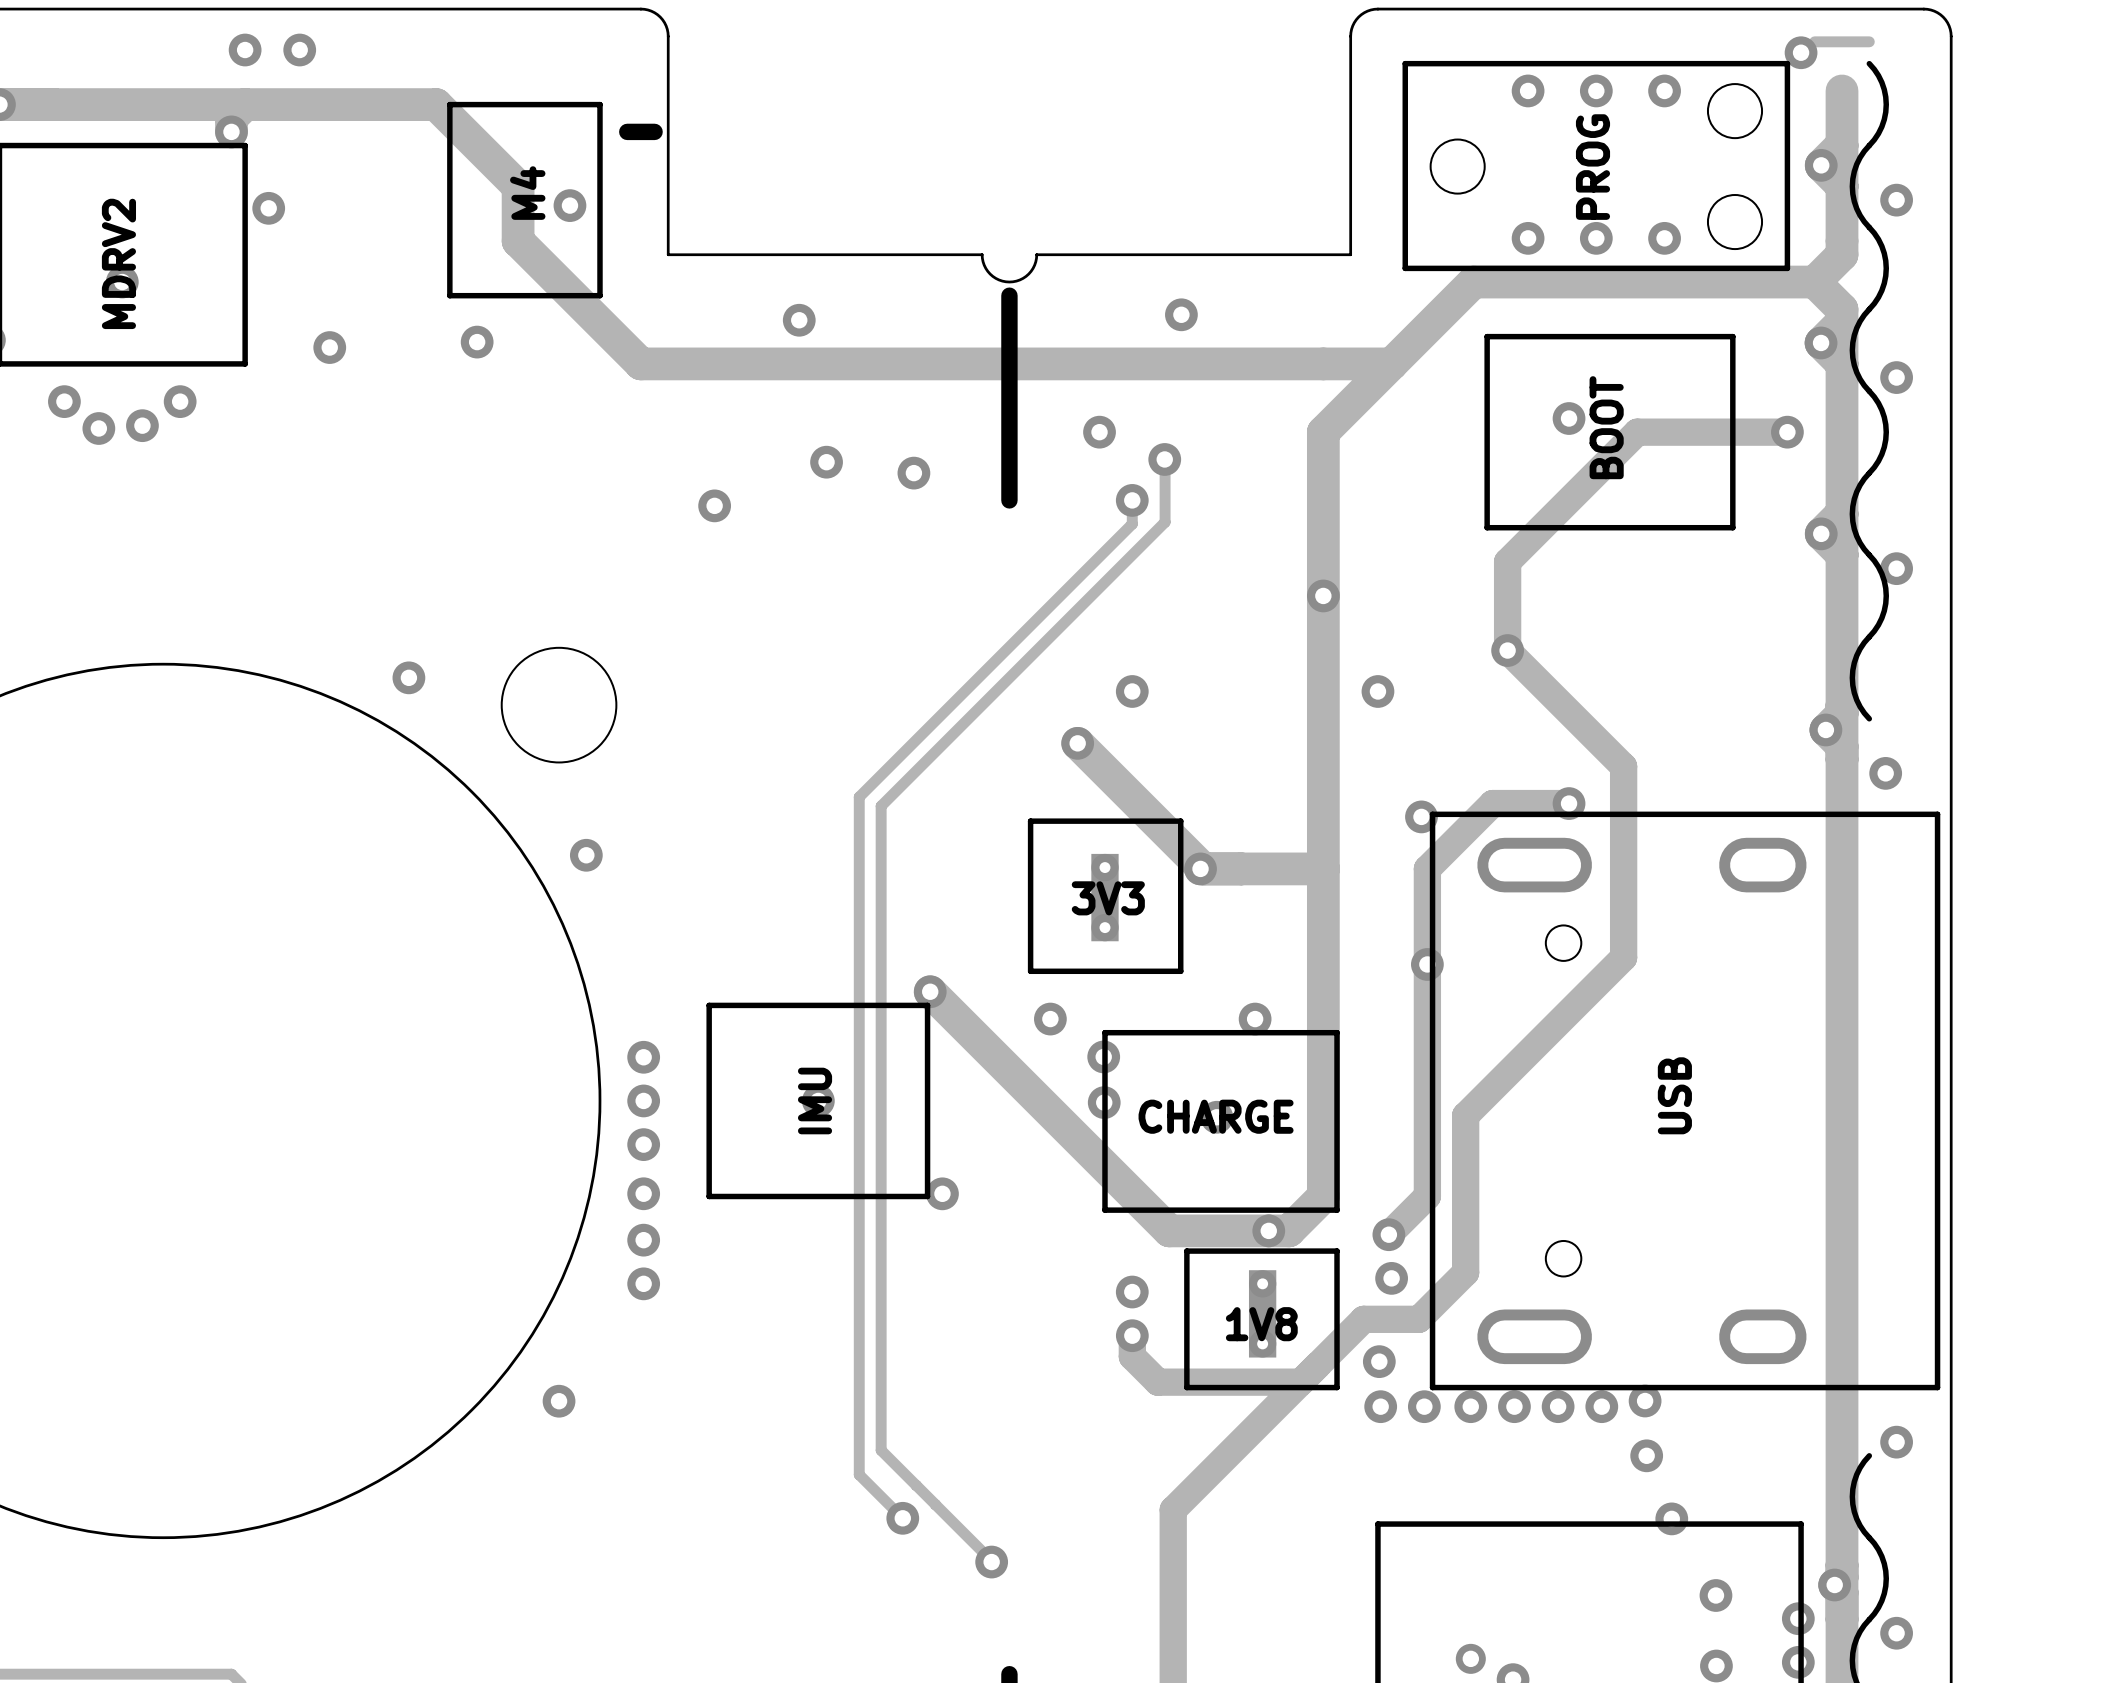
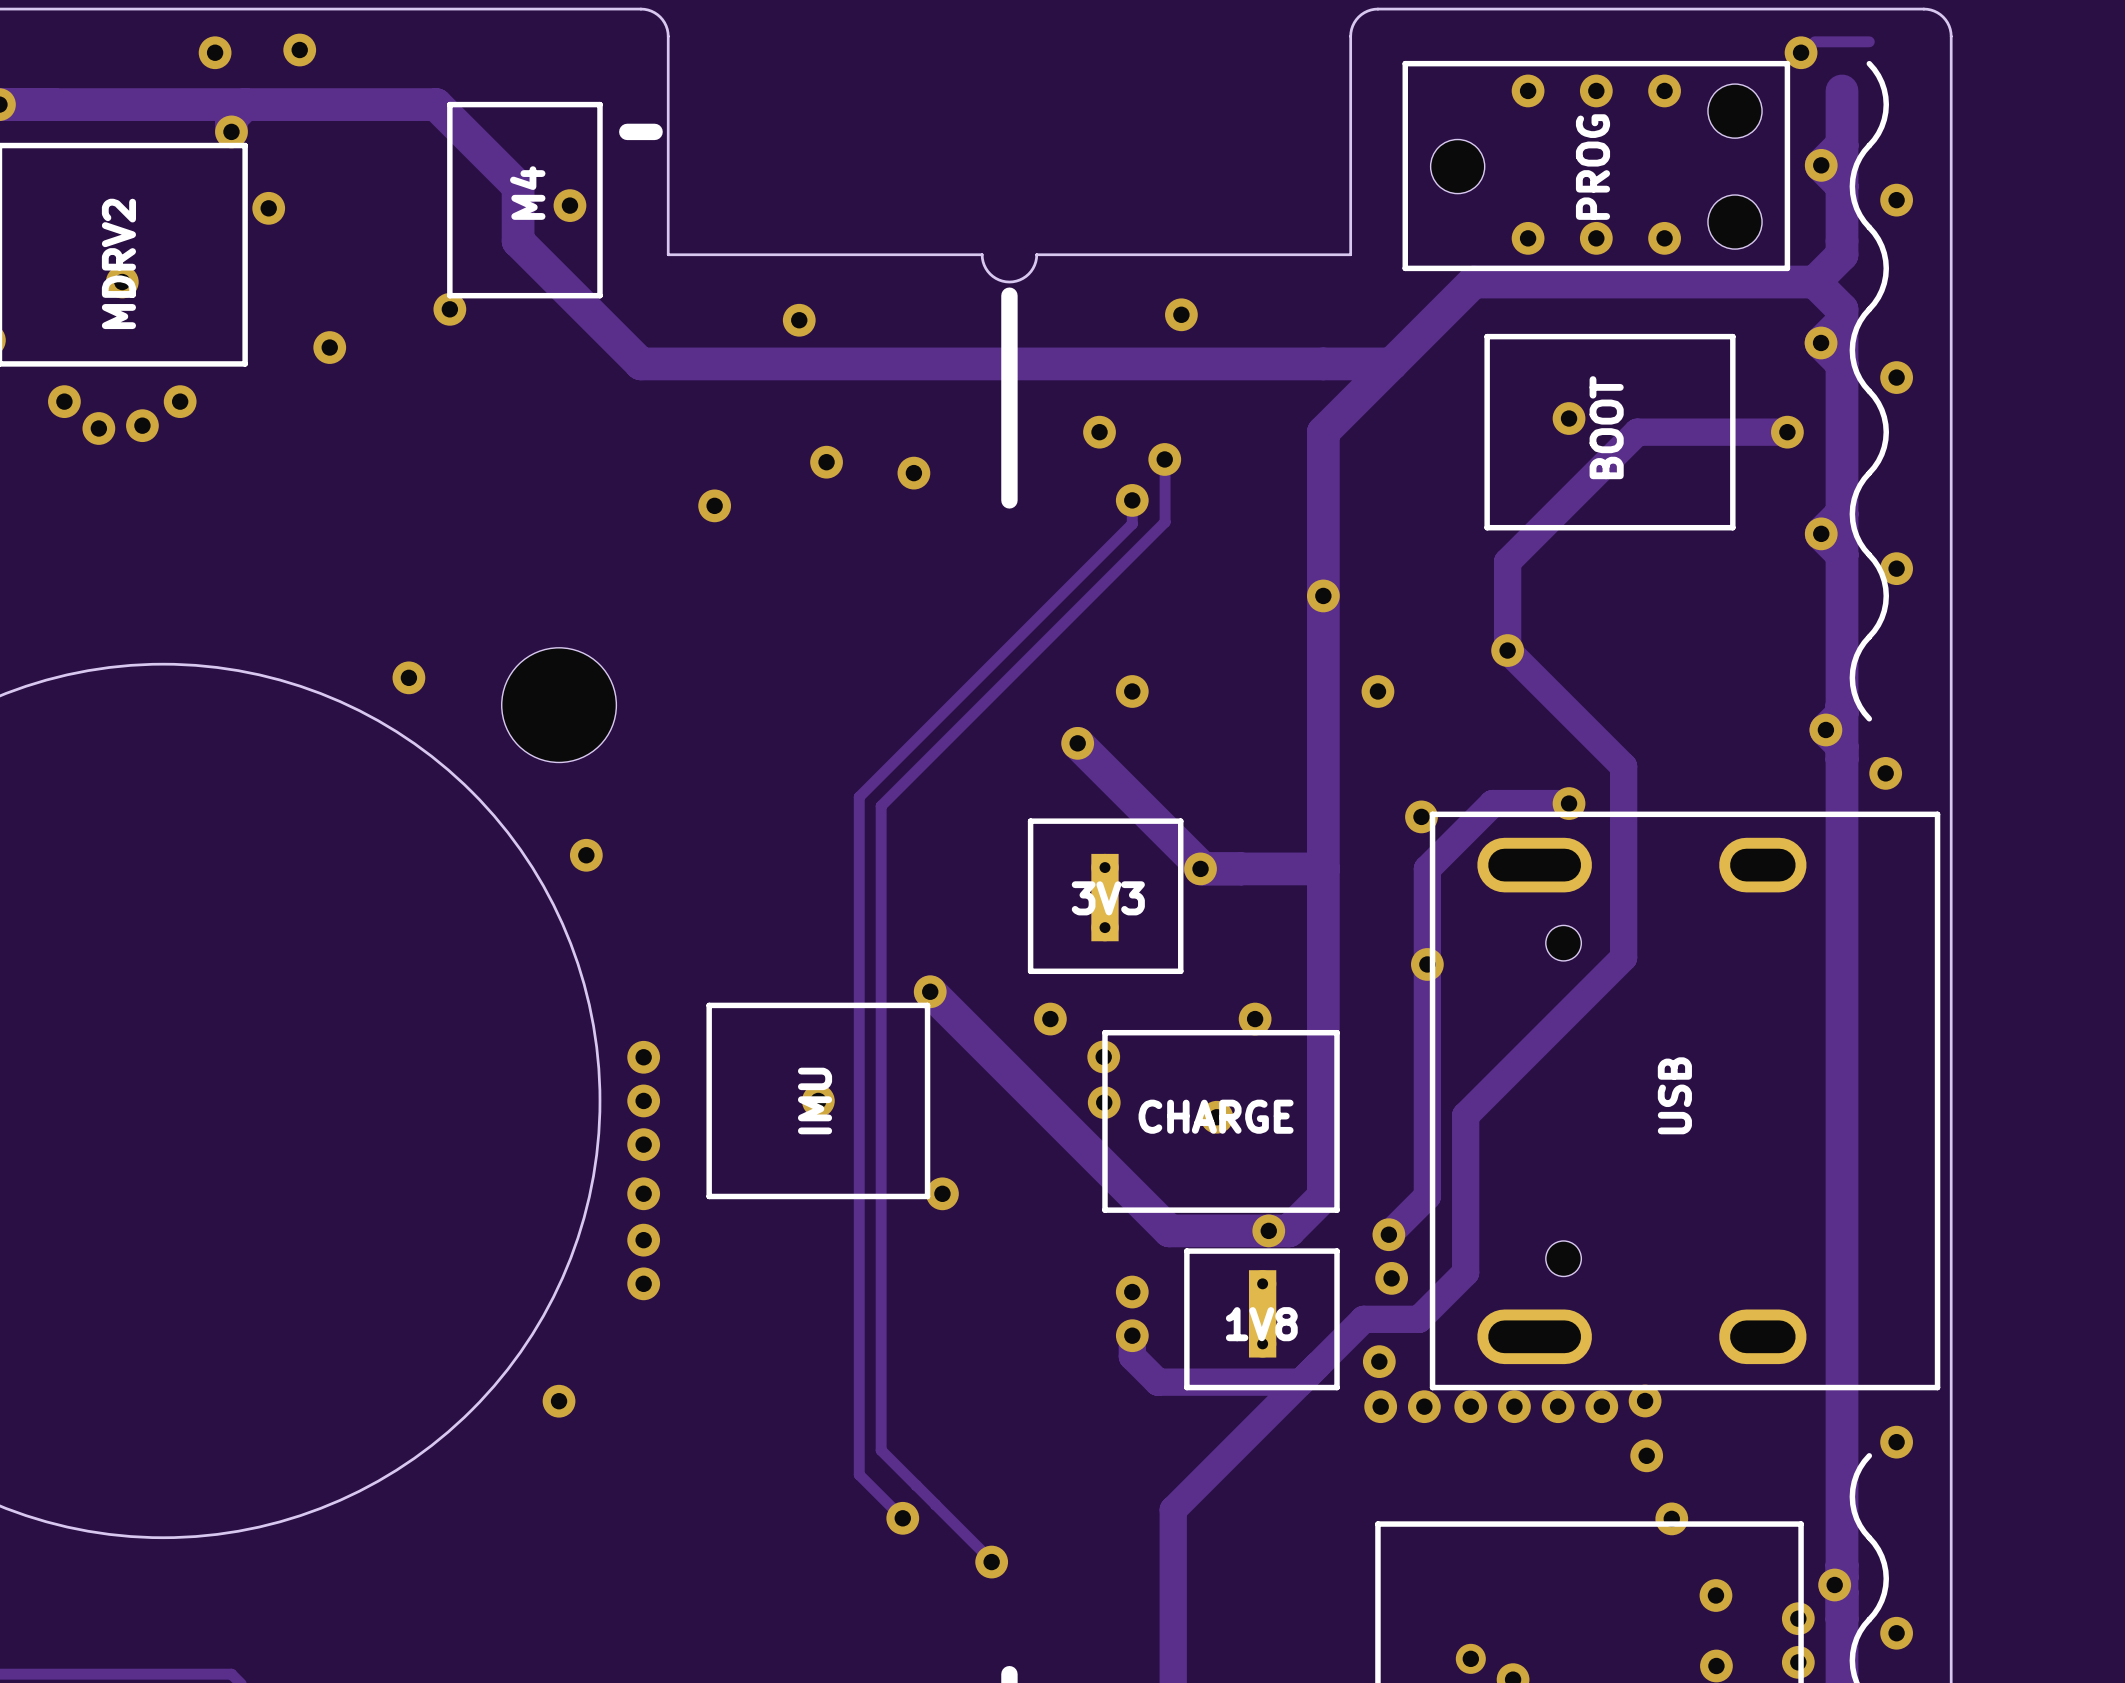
via position: (245, 50) -> (215, 52)
via position: (477, 342) -> (449, 309)

